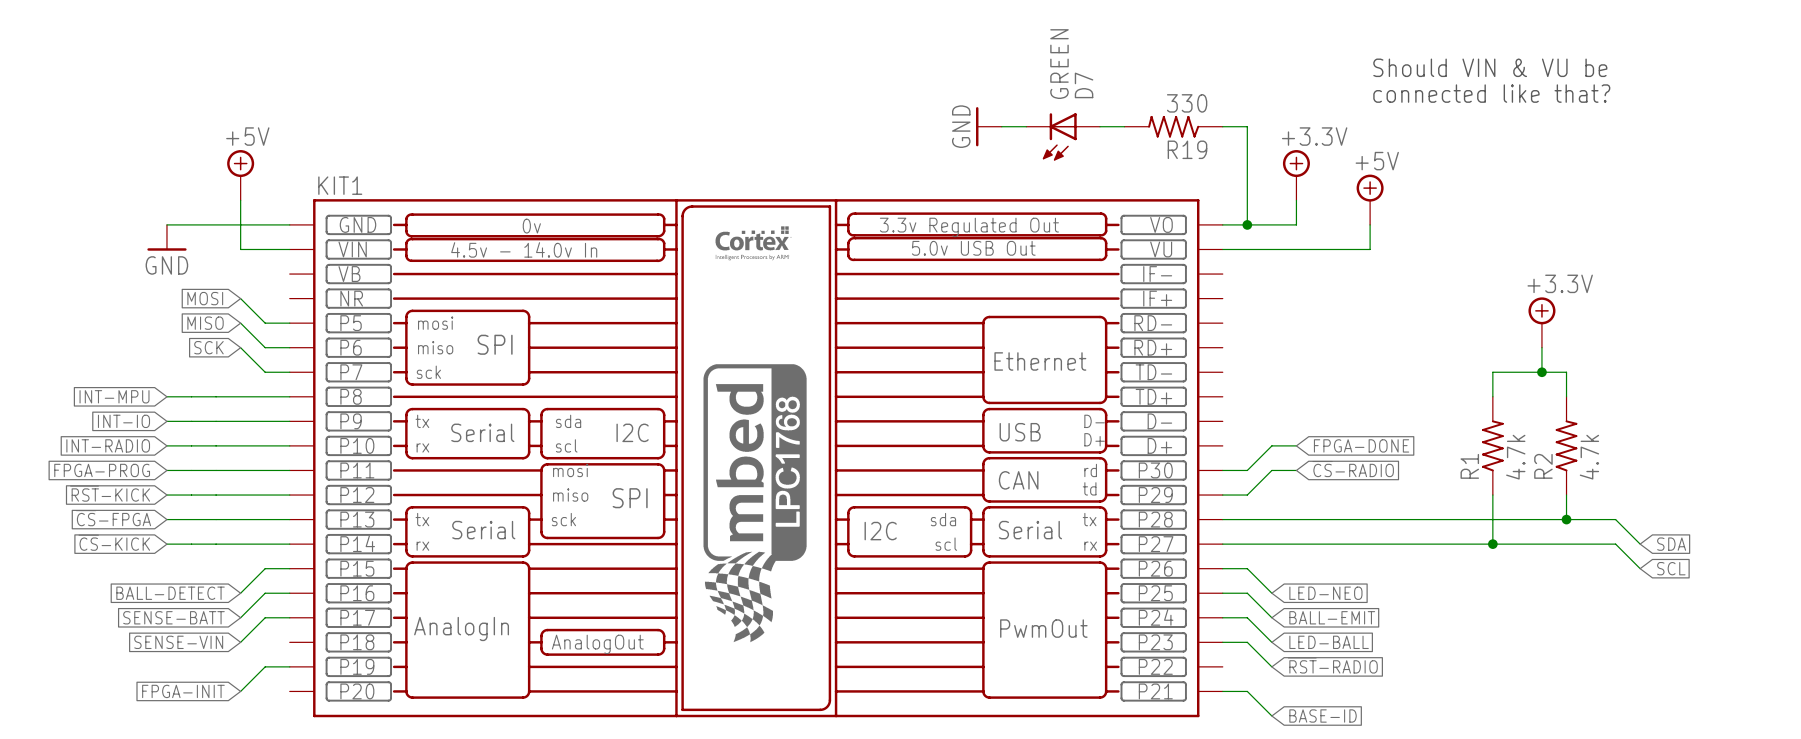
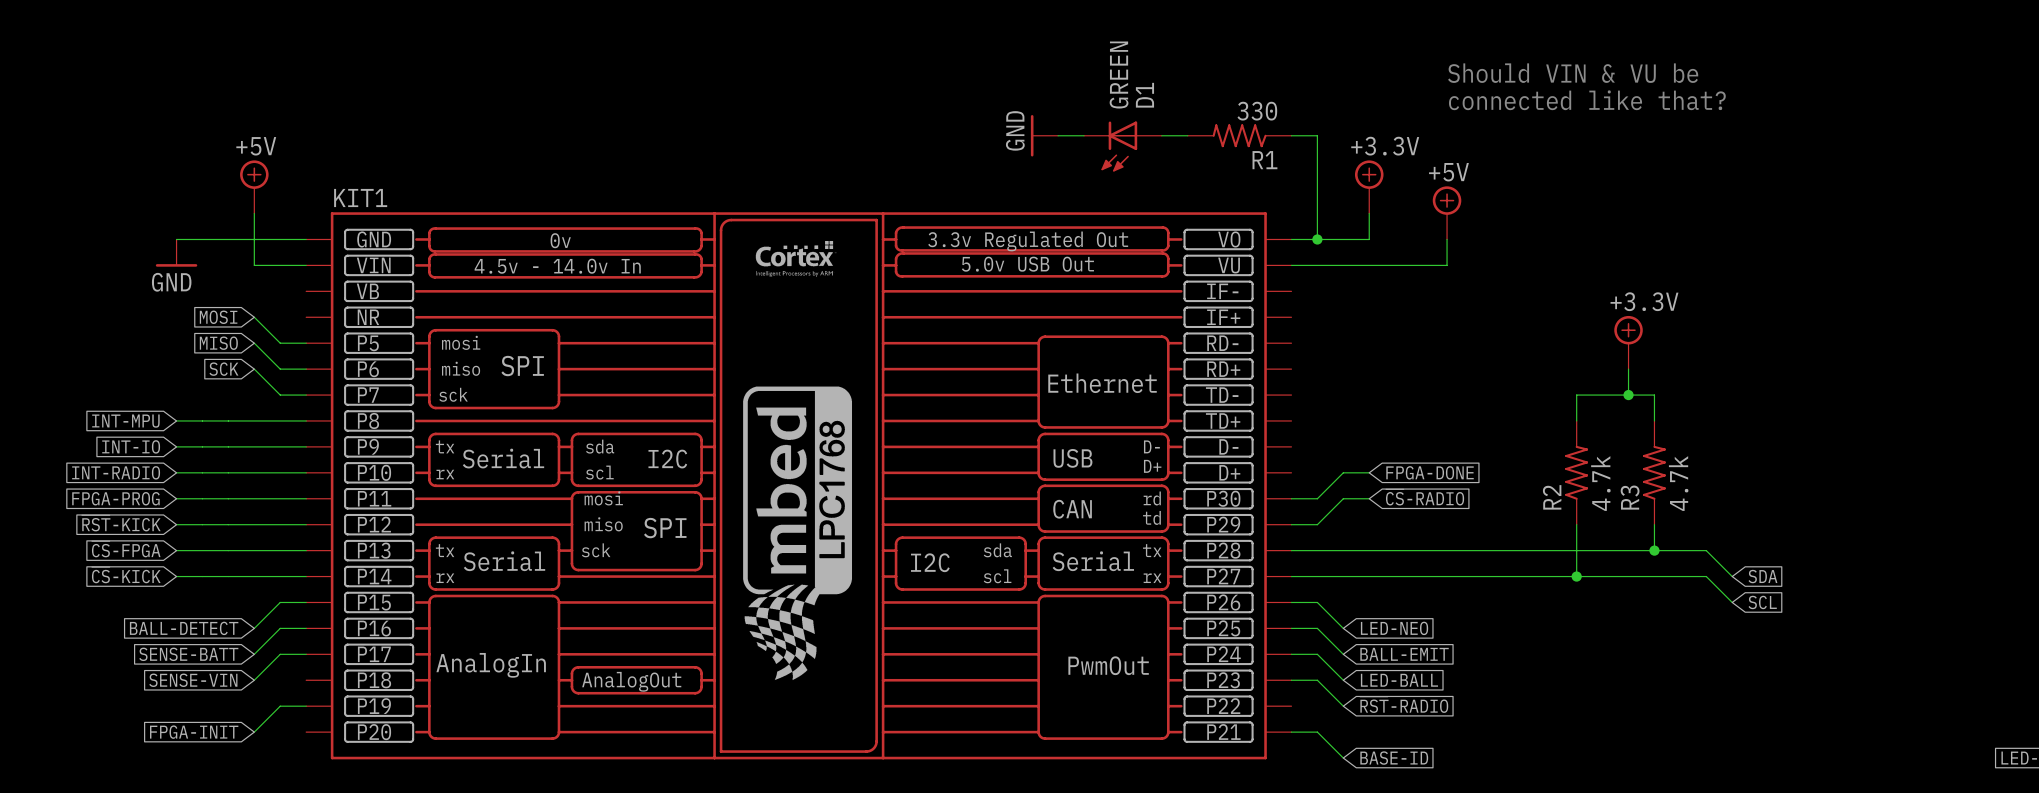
D7 name: D7 (1084, 85) -> D1 (1144, 95)
R19 name: R19 (1187, 149) -> R1 (1264, 160)
R1 name: R1 (1469, 466) -> R2 (1552, 497)
R2 name: R2 (1543, 466) -> R3 (1630, 497)

